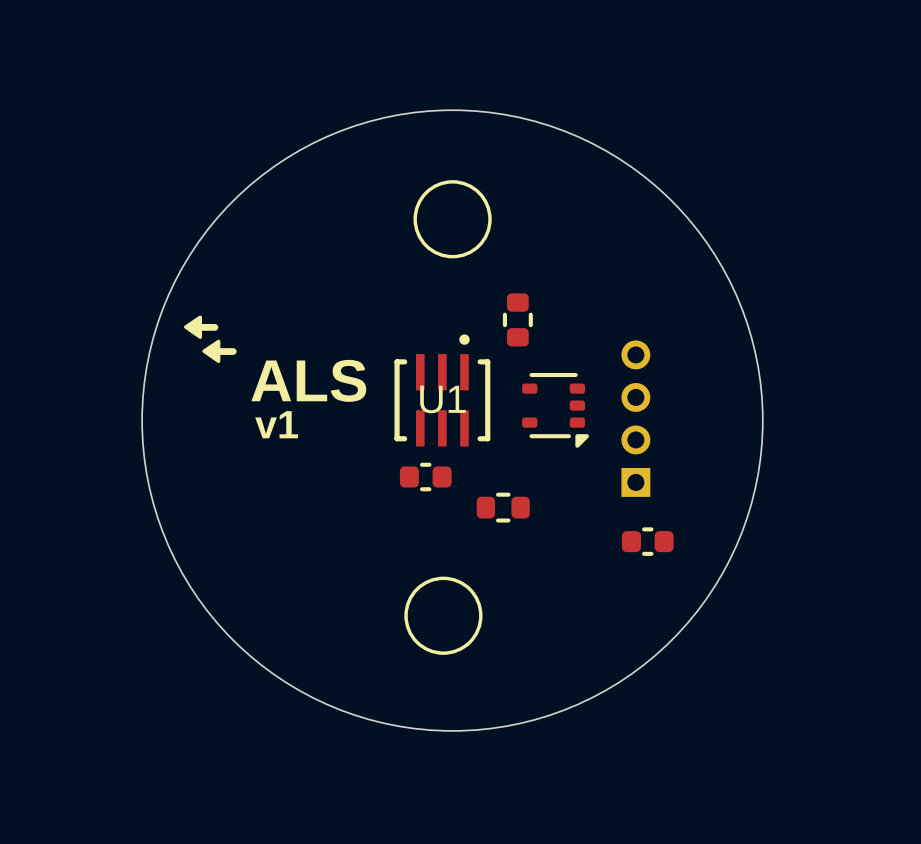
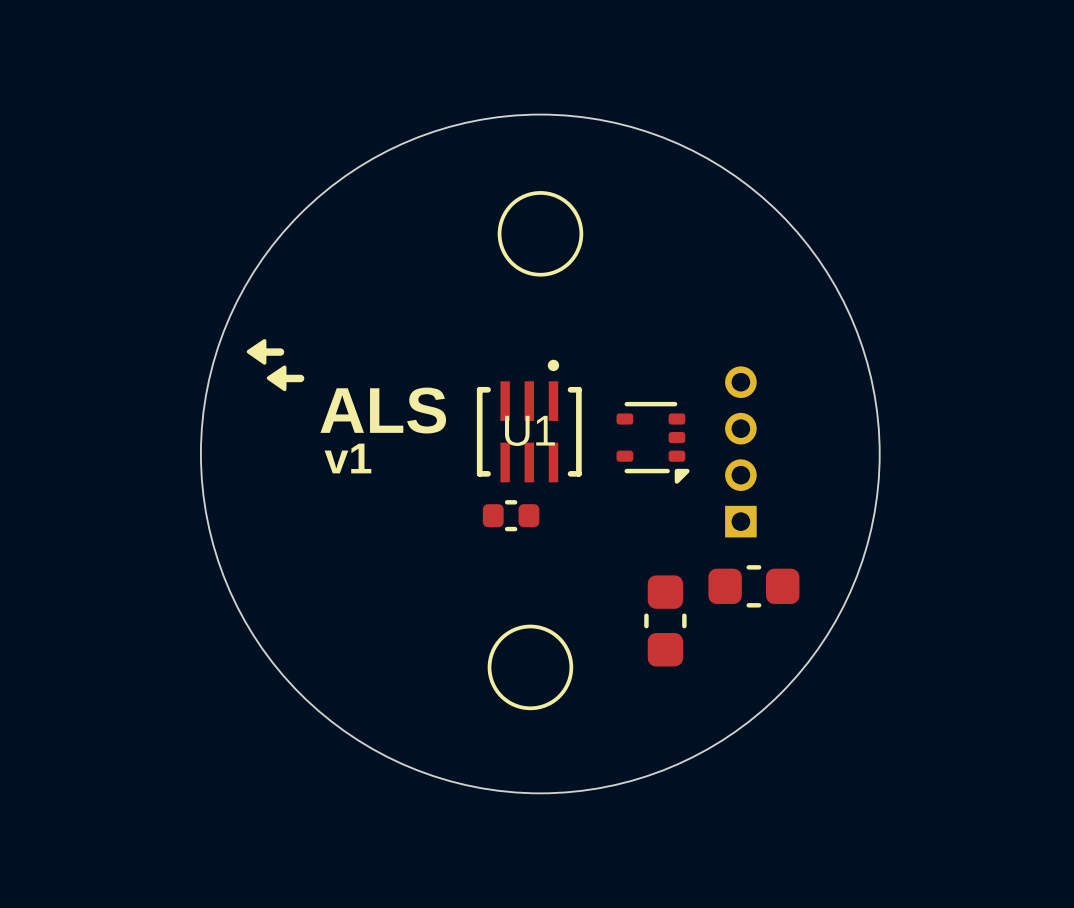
part: (517, 319) -> none
part: (503, 507) -> none
part footprint: [621, 527, 674, 556] -> [708, 565, 800, 608]
part: none -> (665, 620)

